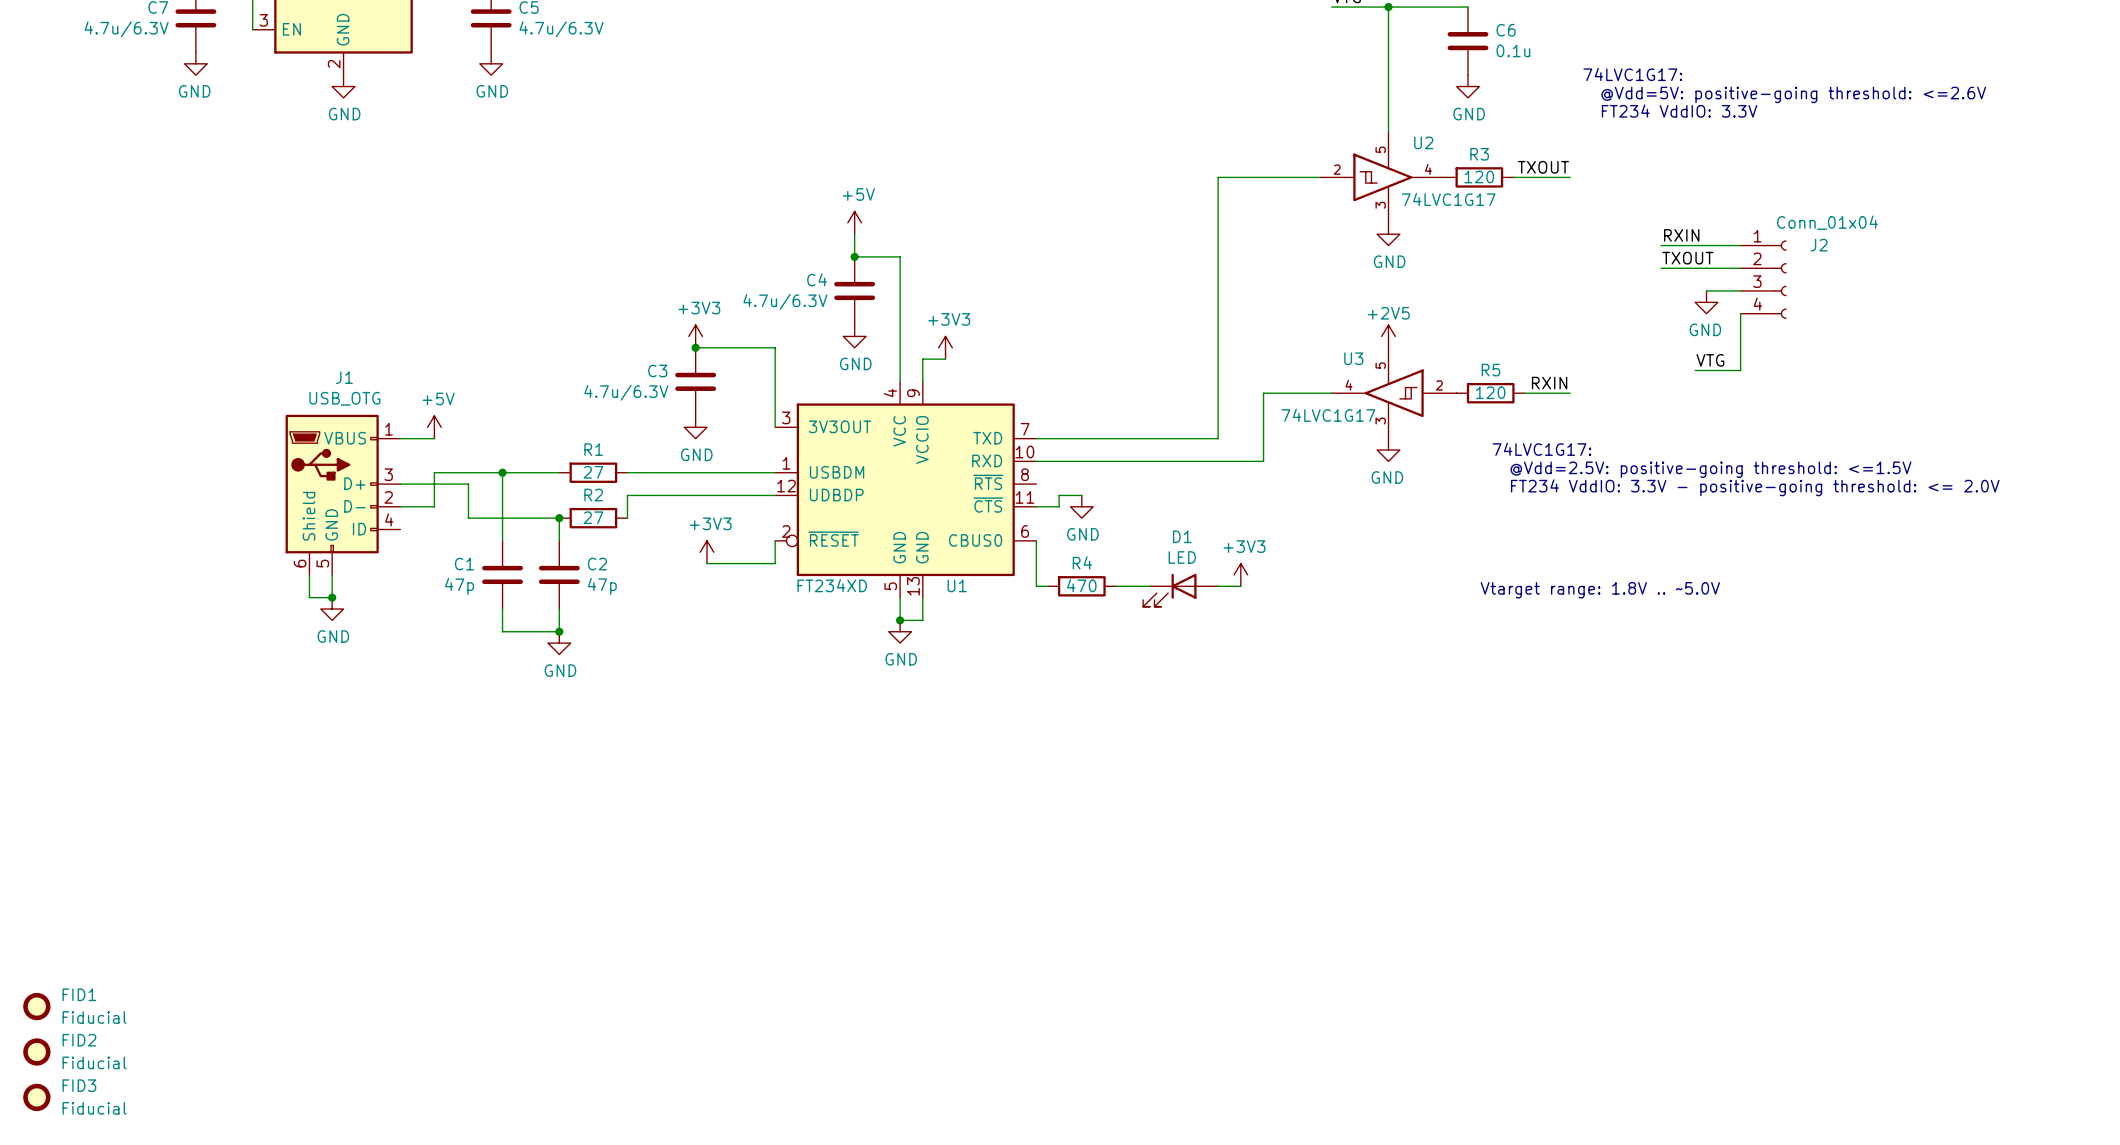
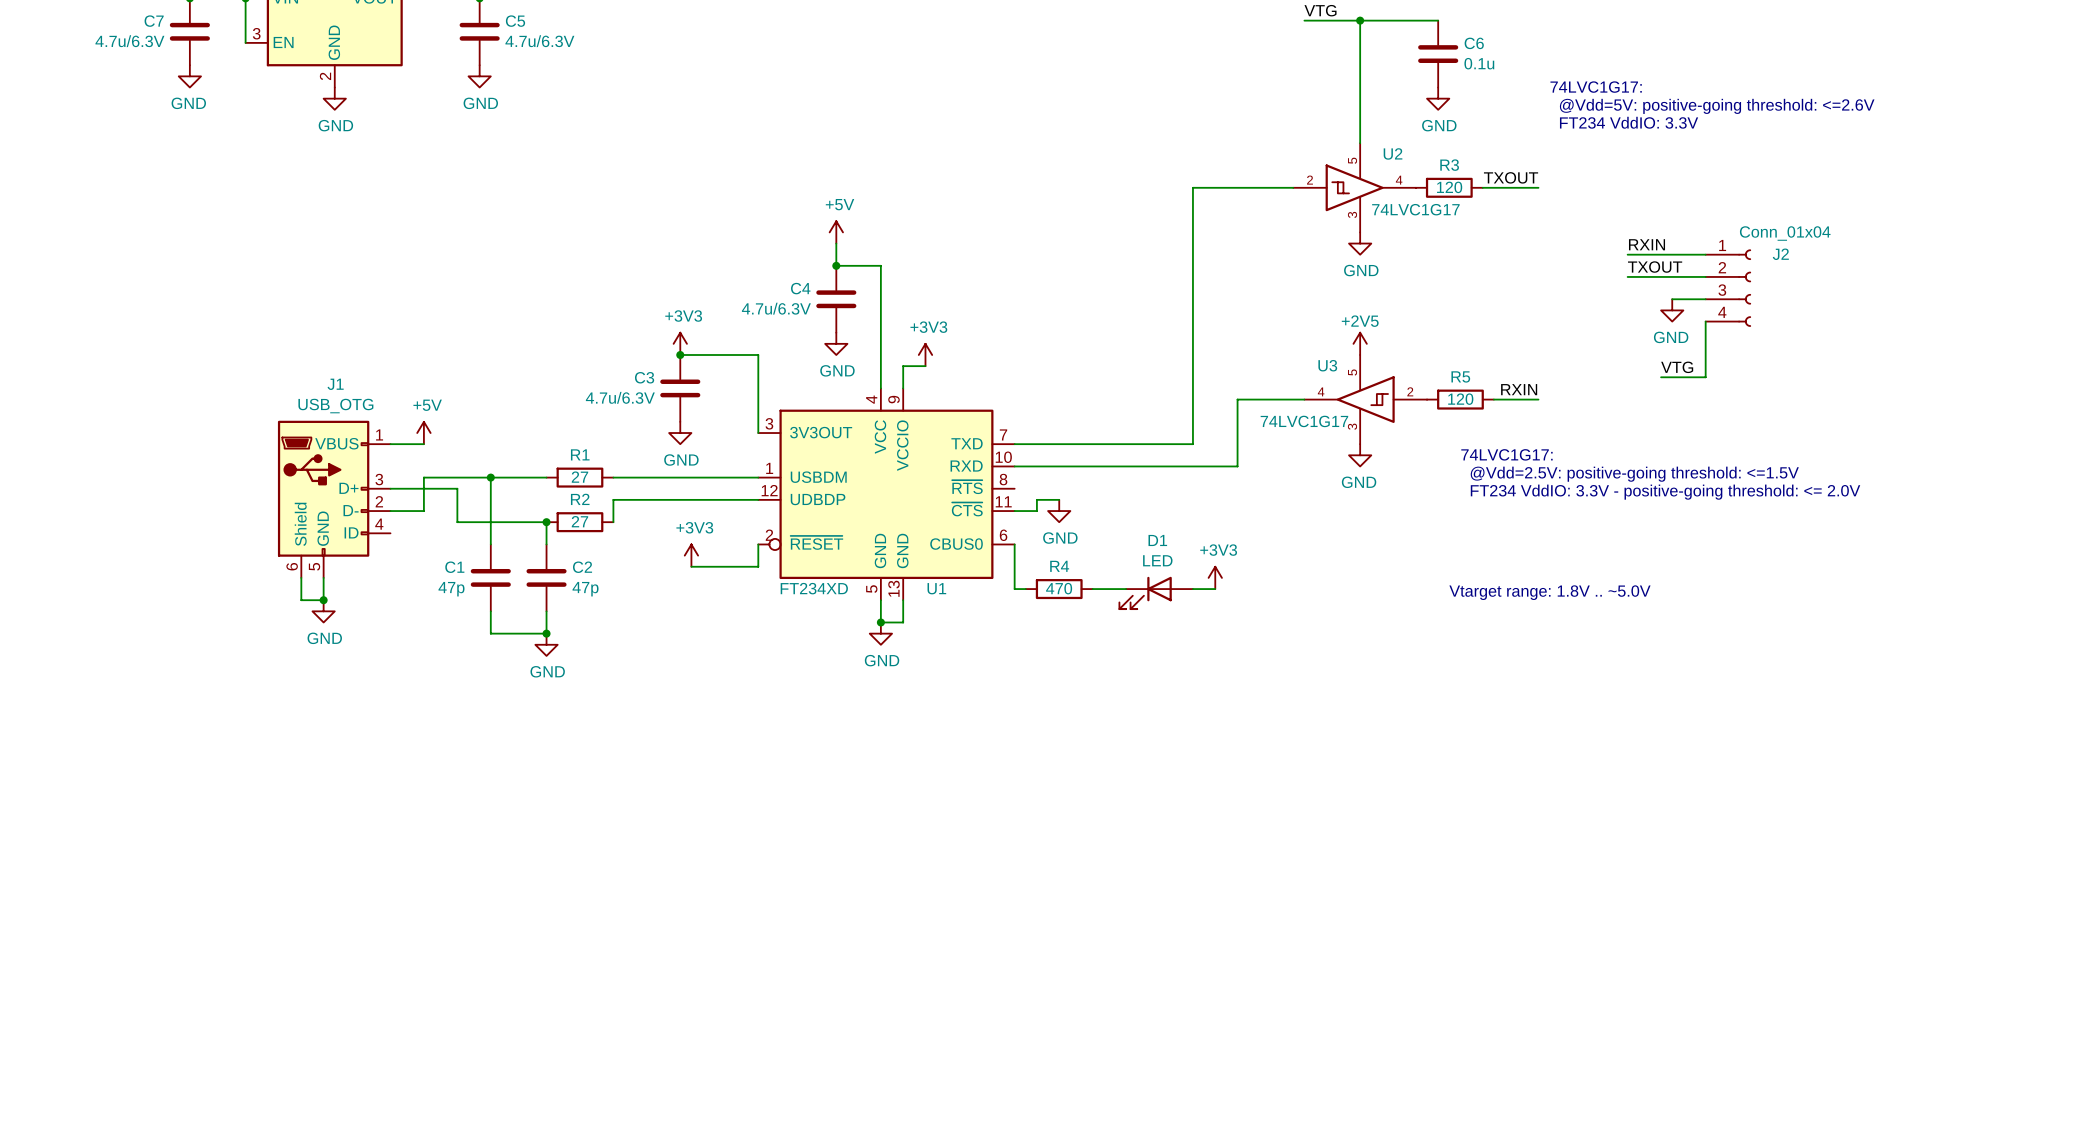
FID1: Fiducial (36, 1006) -> none
FID2: Fiducial (36, 1051) -> none
FID3: Fiducial (36, 1097) -> none

